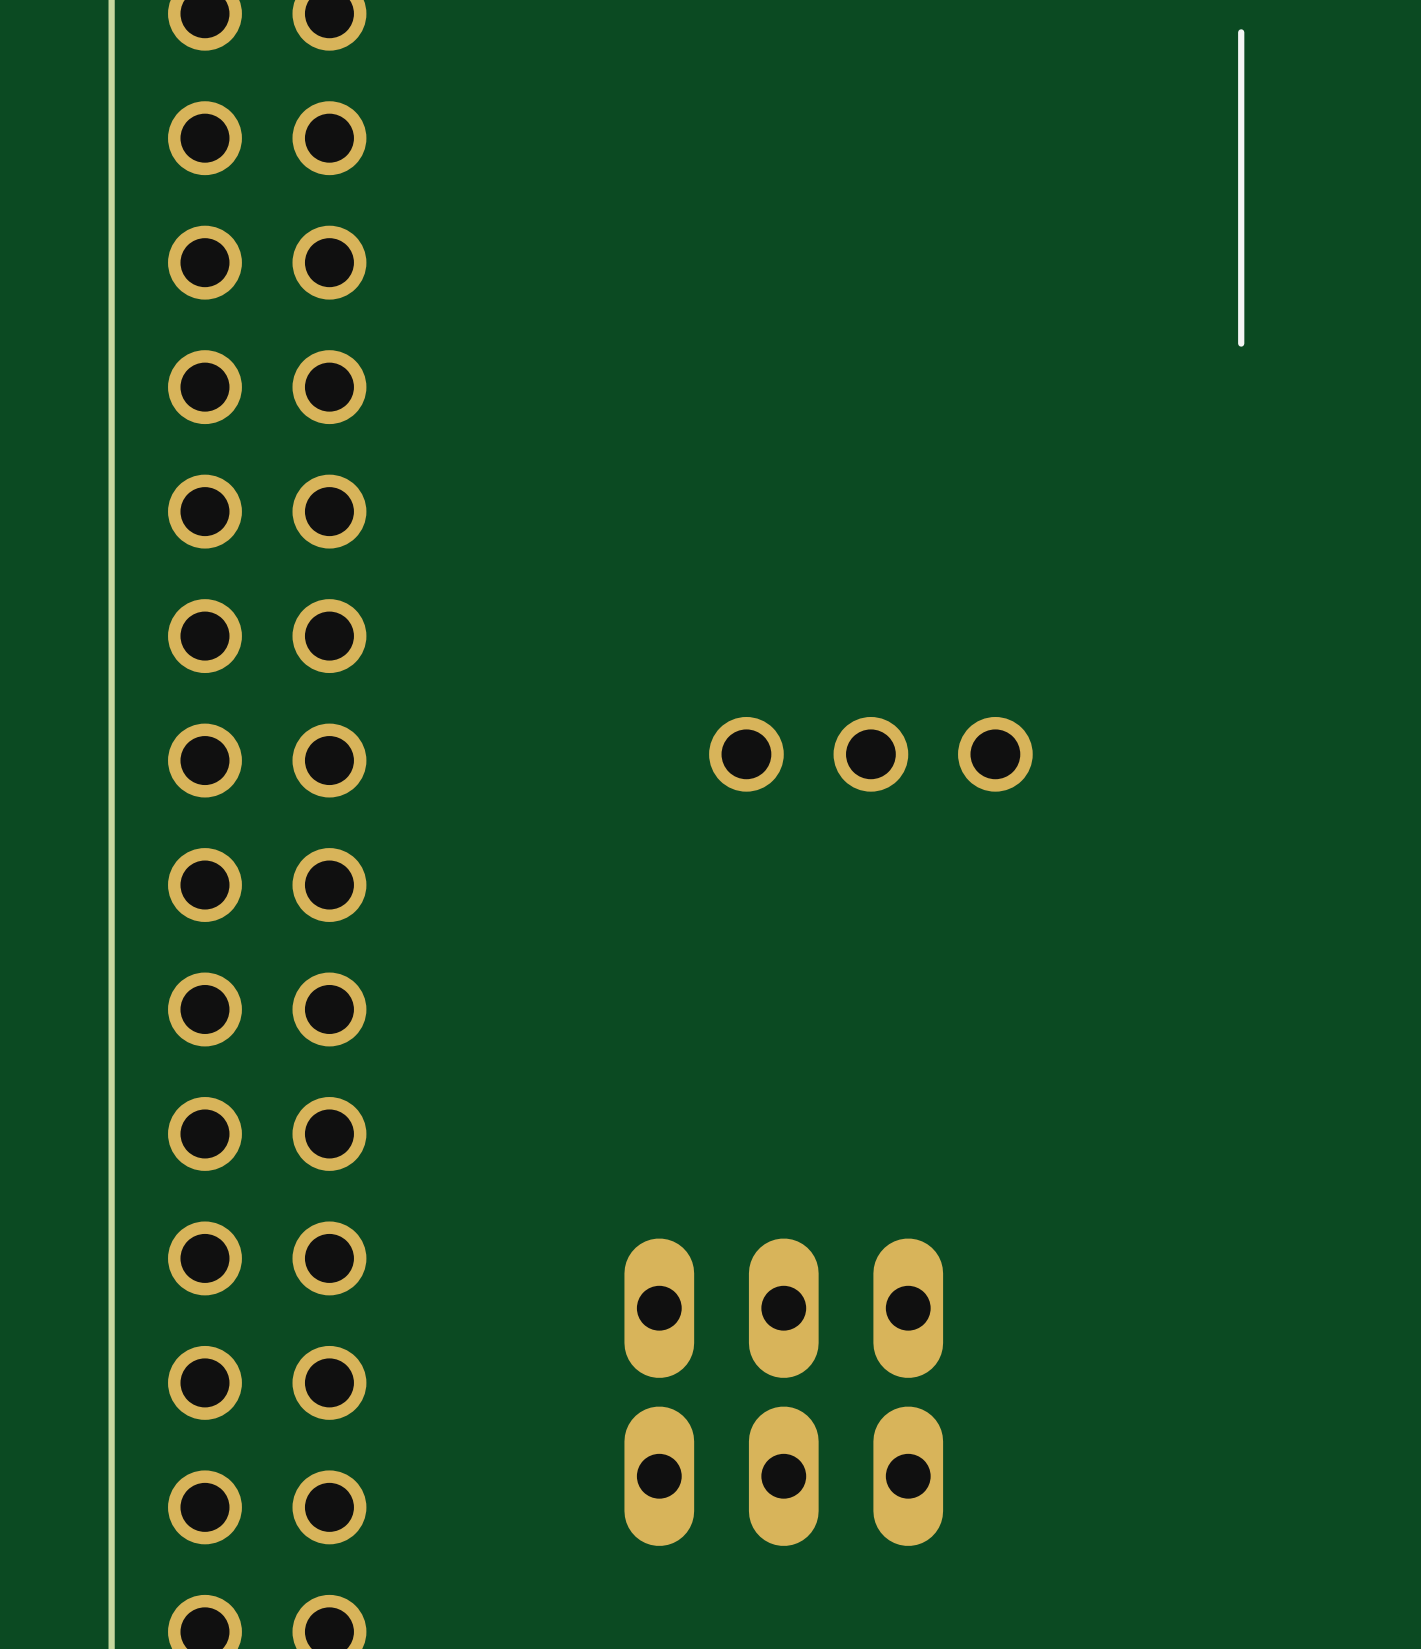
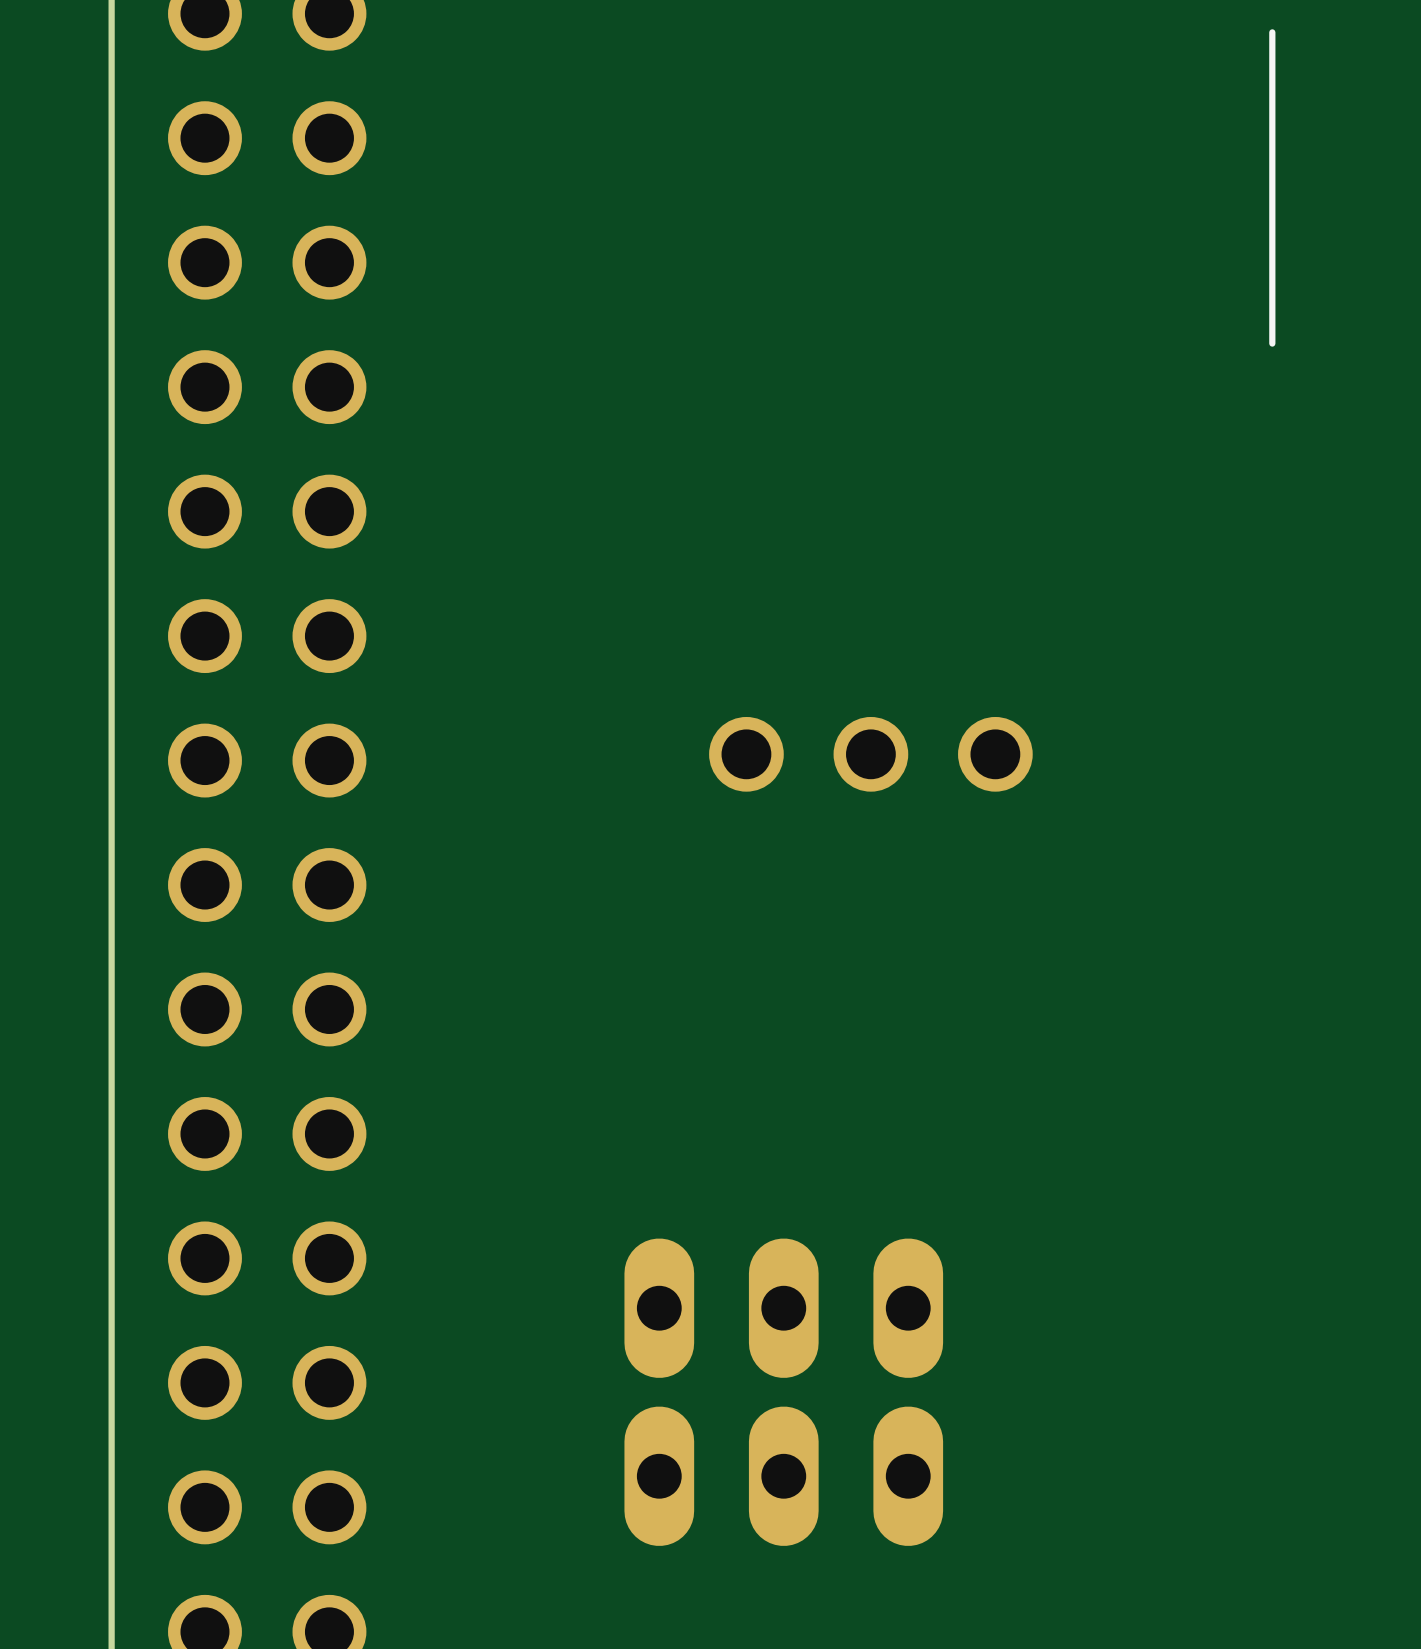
part position: (1241, 187) -> (1272, 187)

